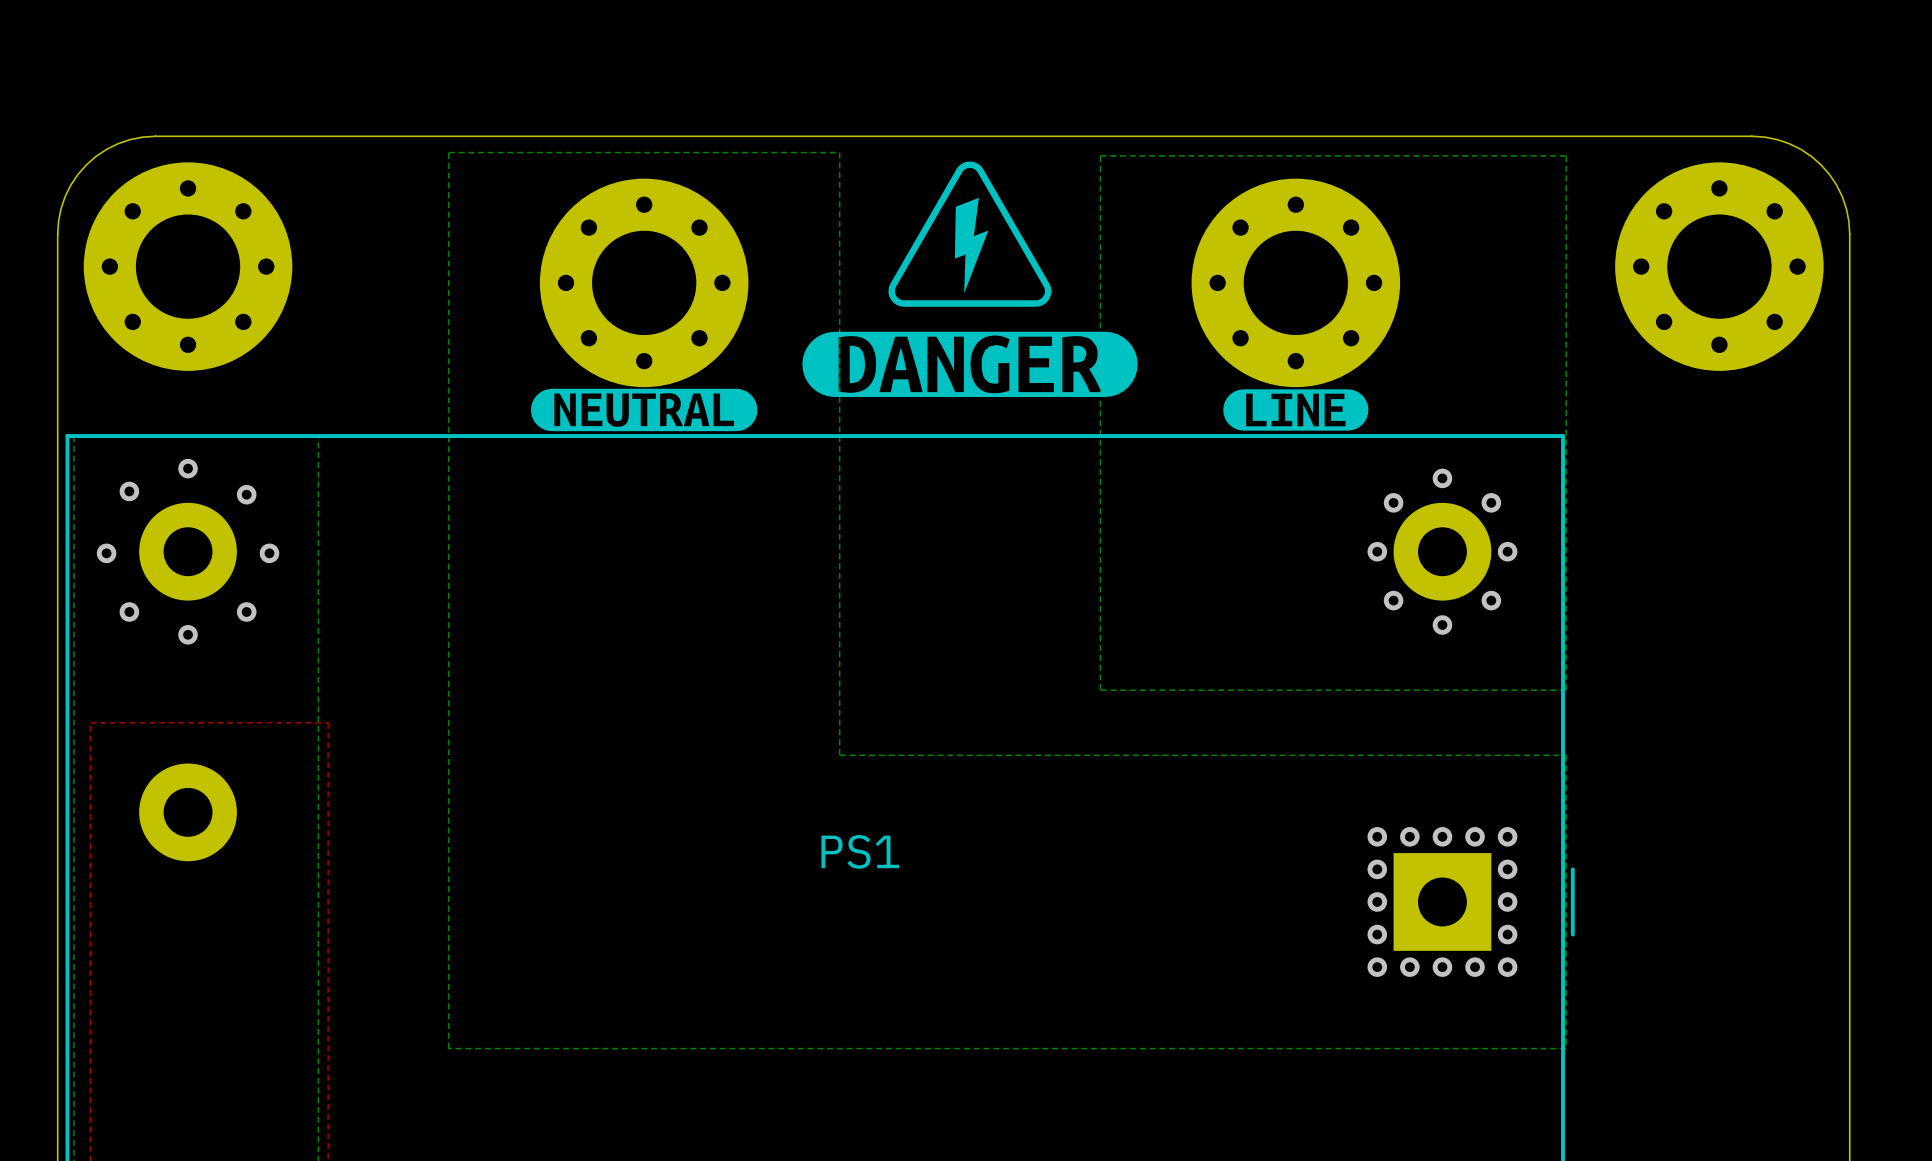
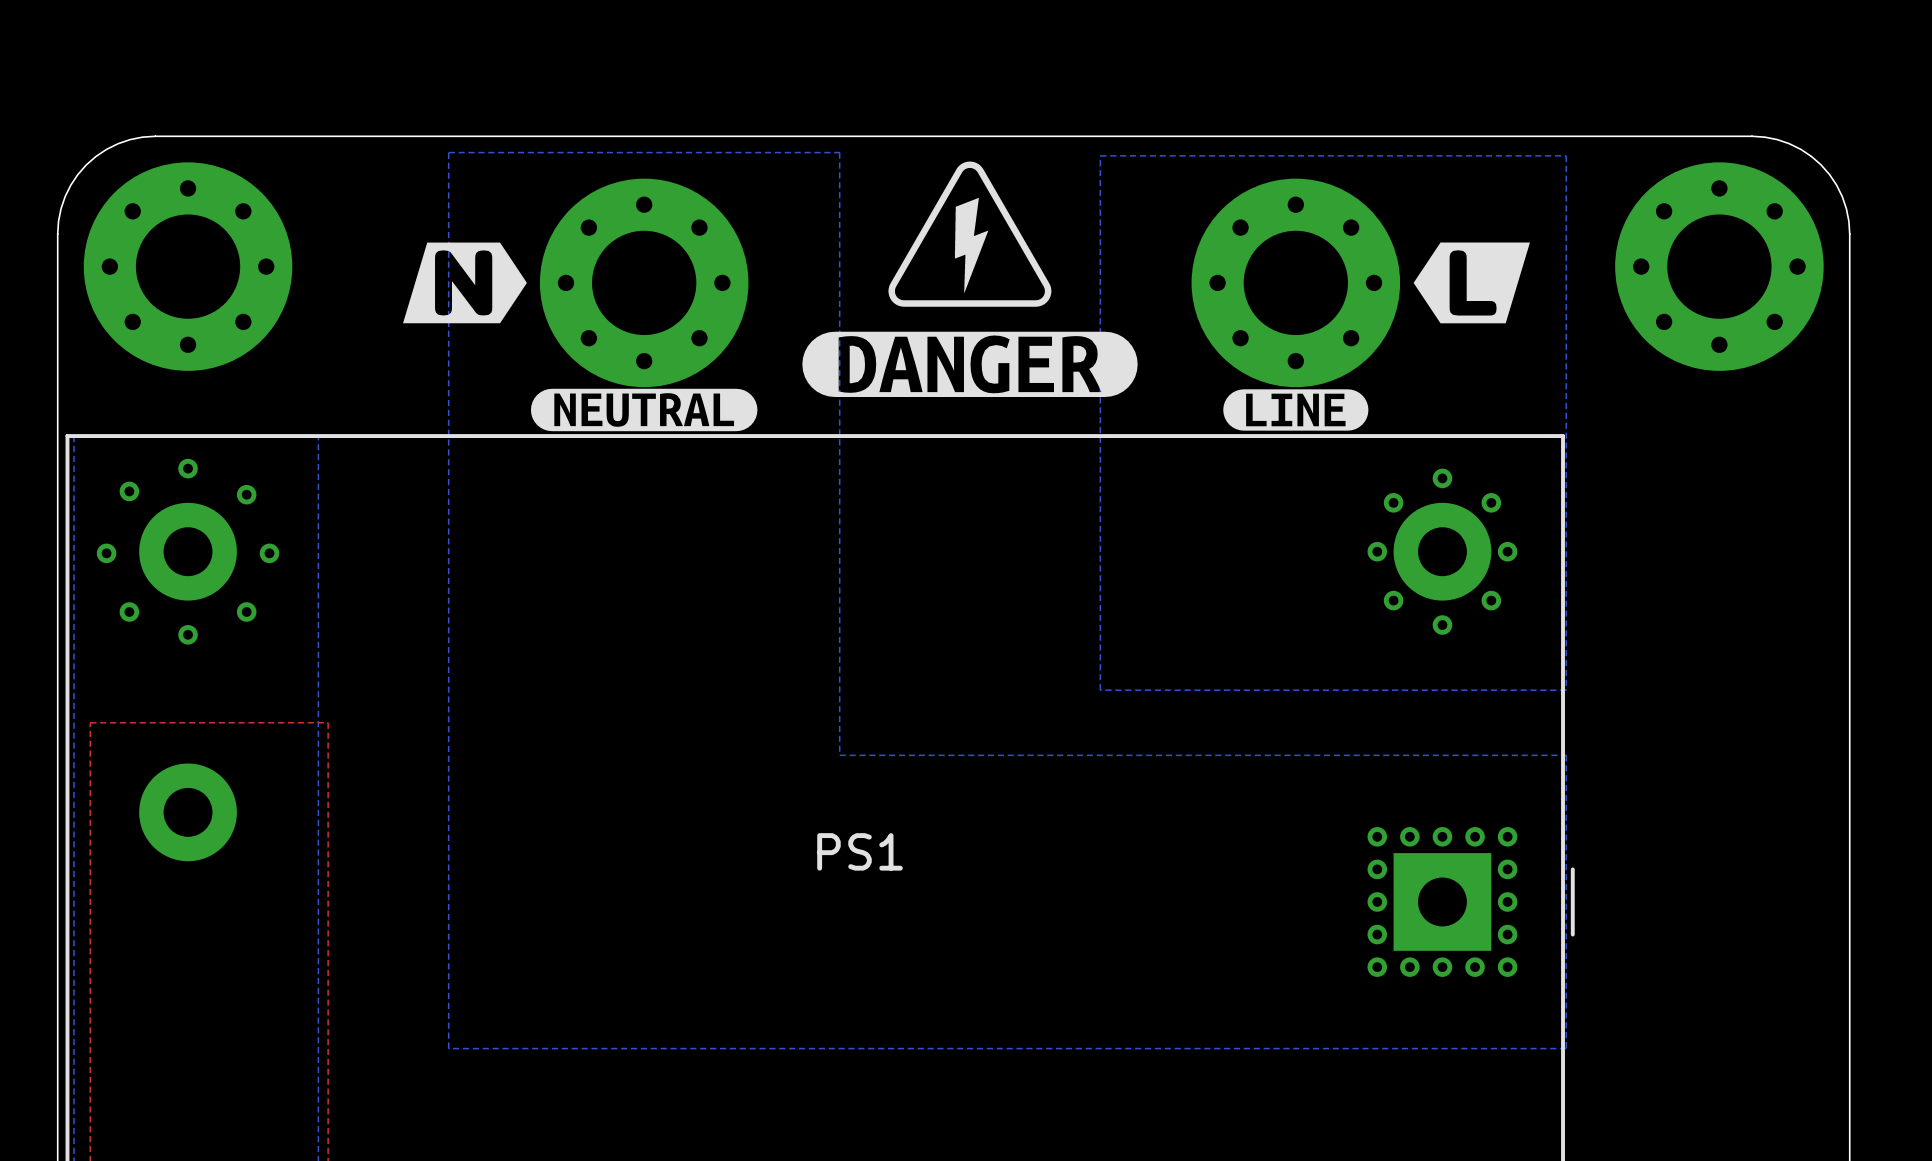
drawing: none -> [403, 242, 527, 324]
drawing: none -> [1413, 242, 1530, 324]

